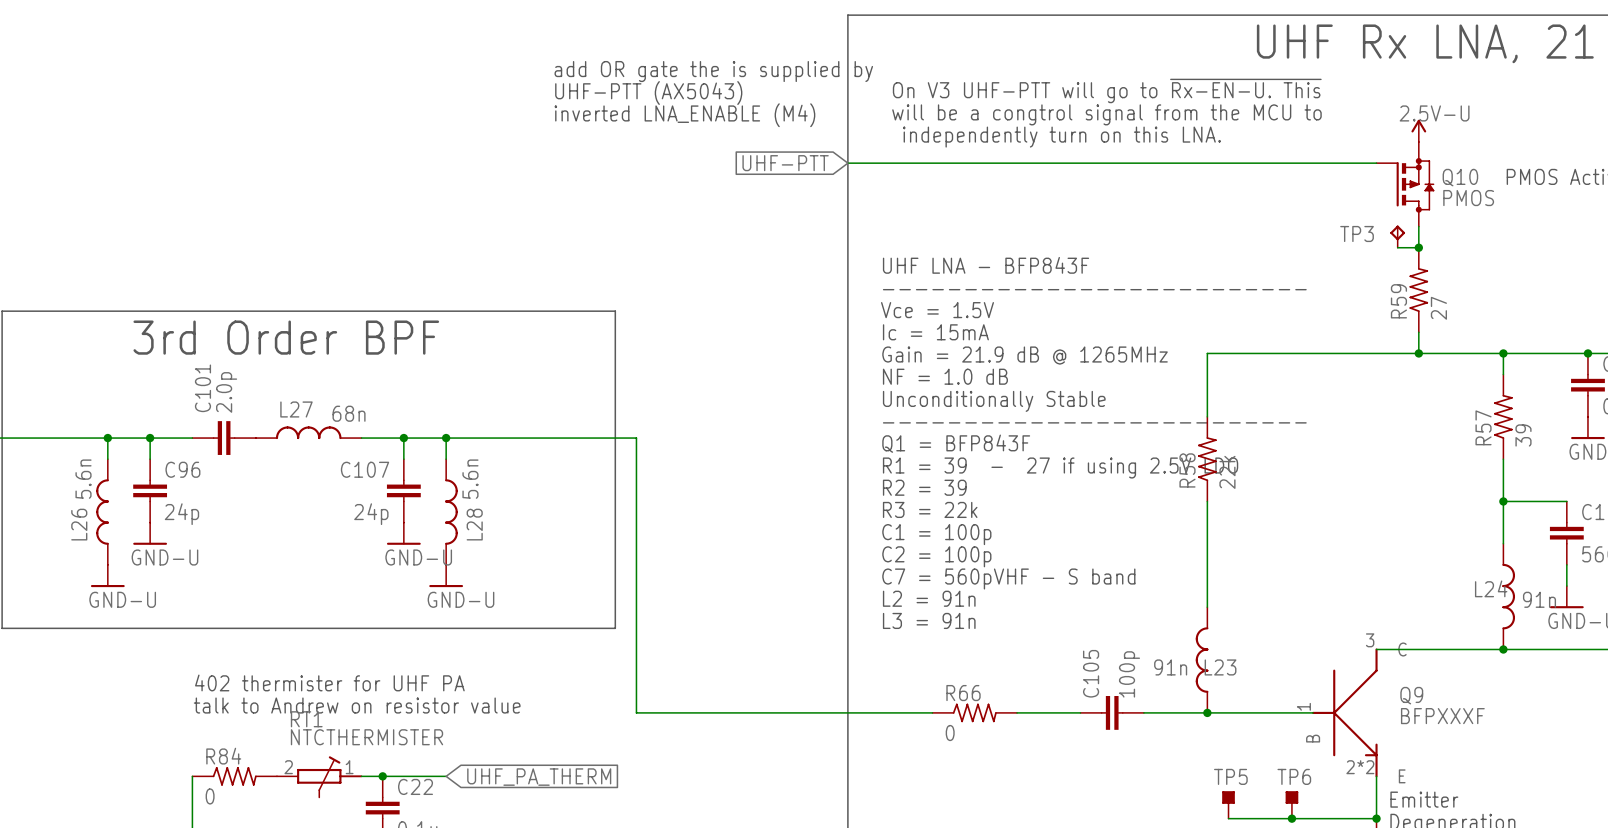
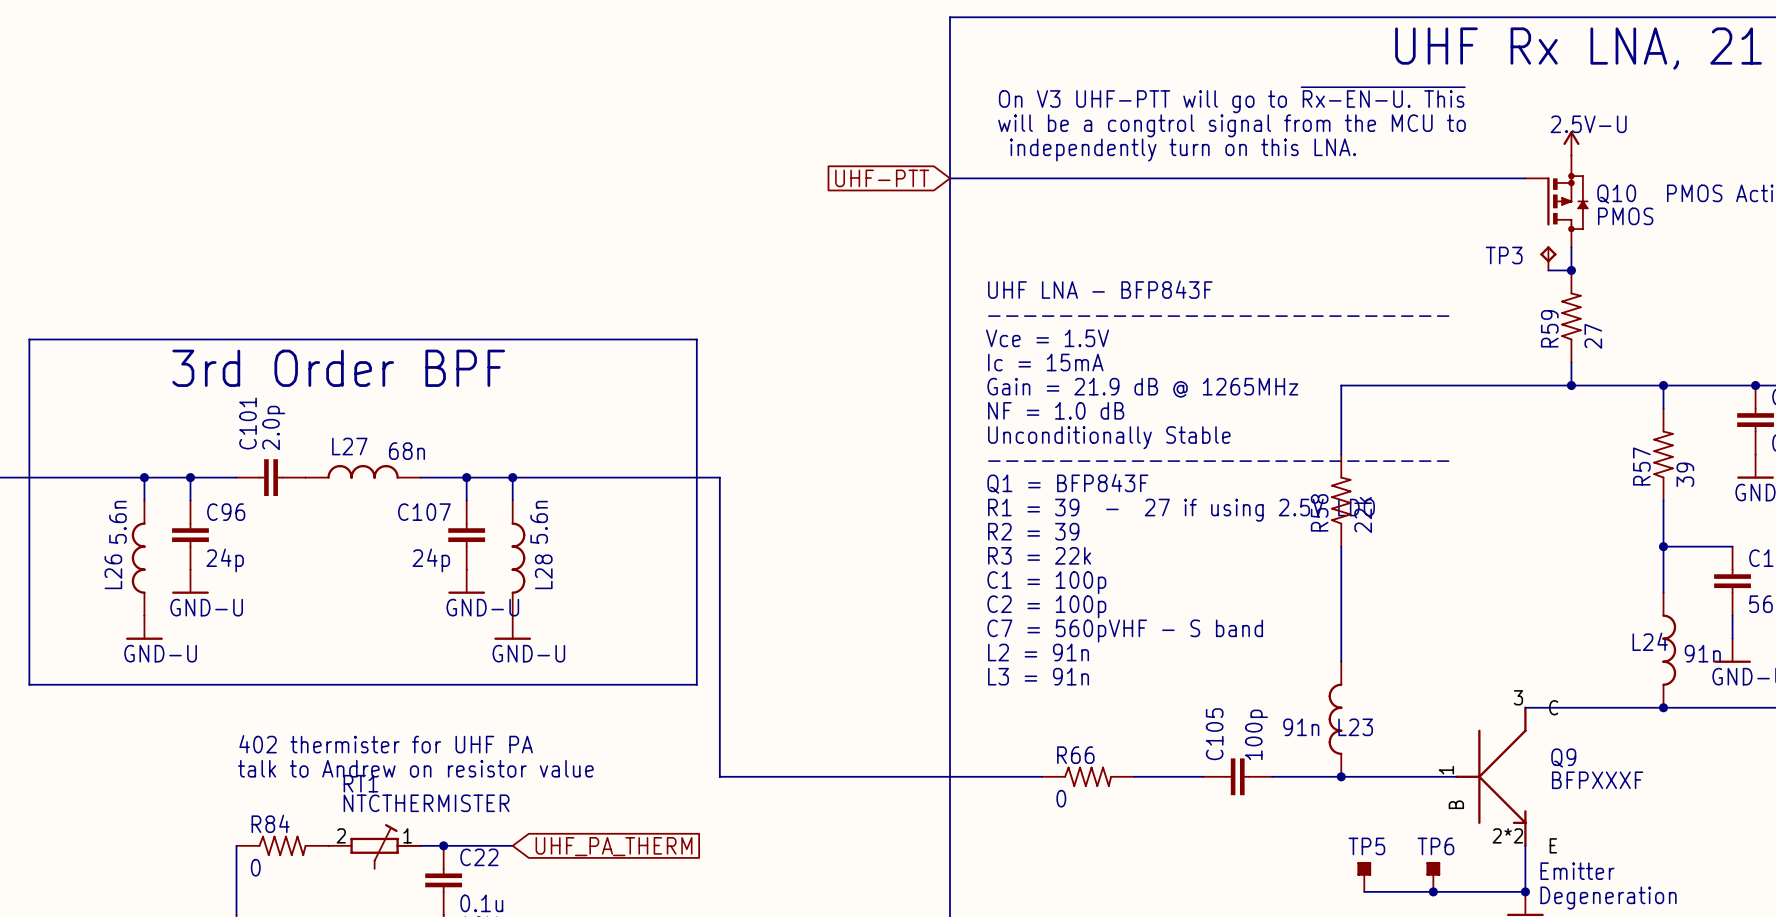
text: add OR gate the is supplied by (713, 71) -> none
text: UHF-PTT (AX5043) (648, 93) -> none
text: inverted LNA_ENABLE (M4) (684, 115) -> none

